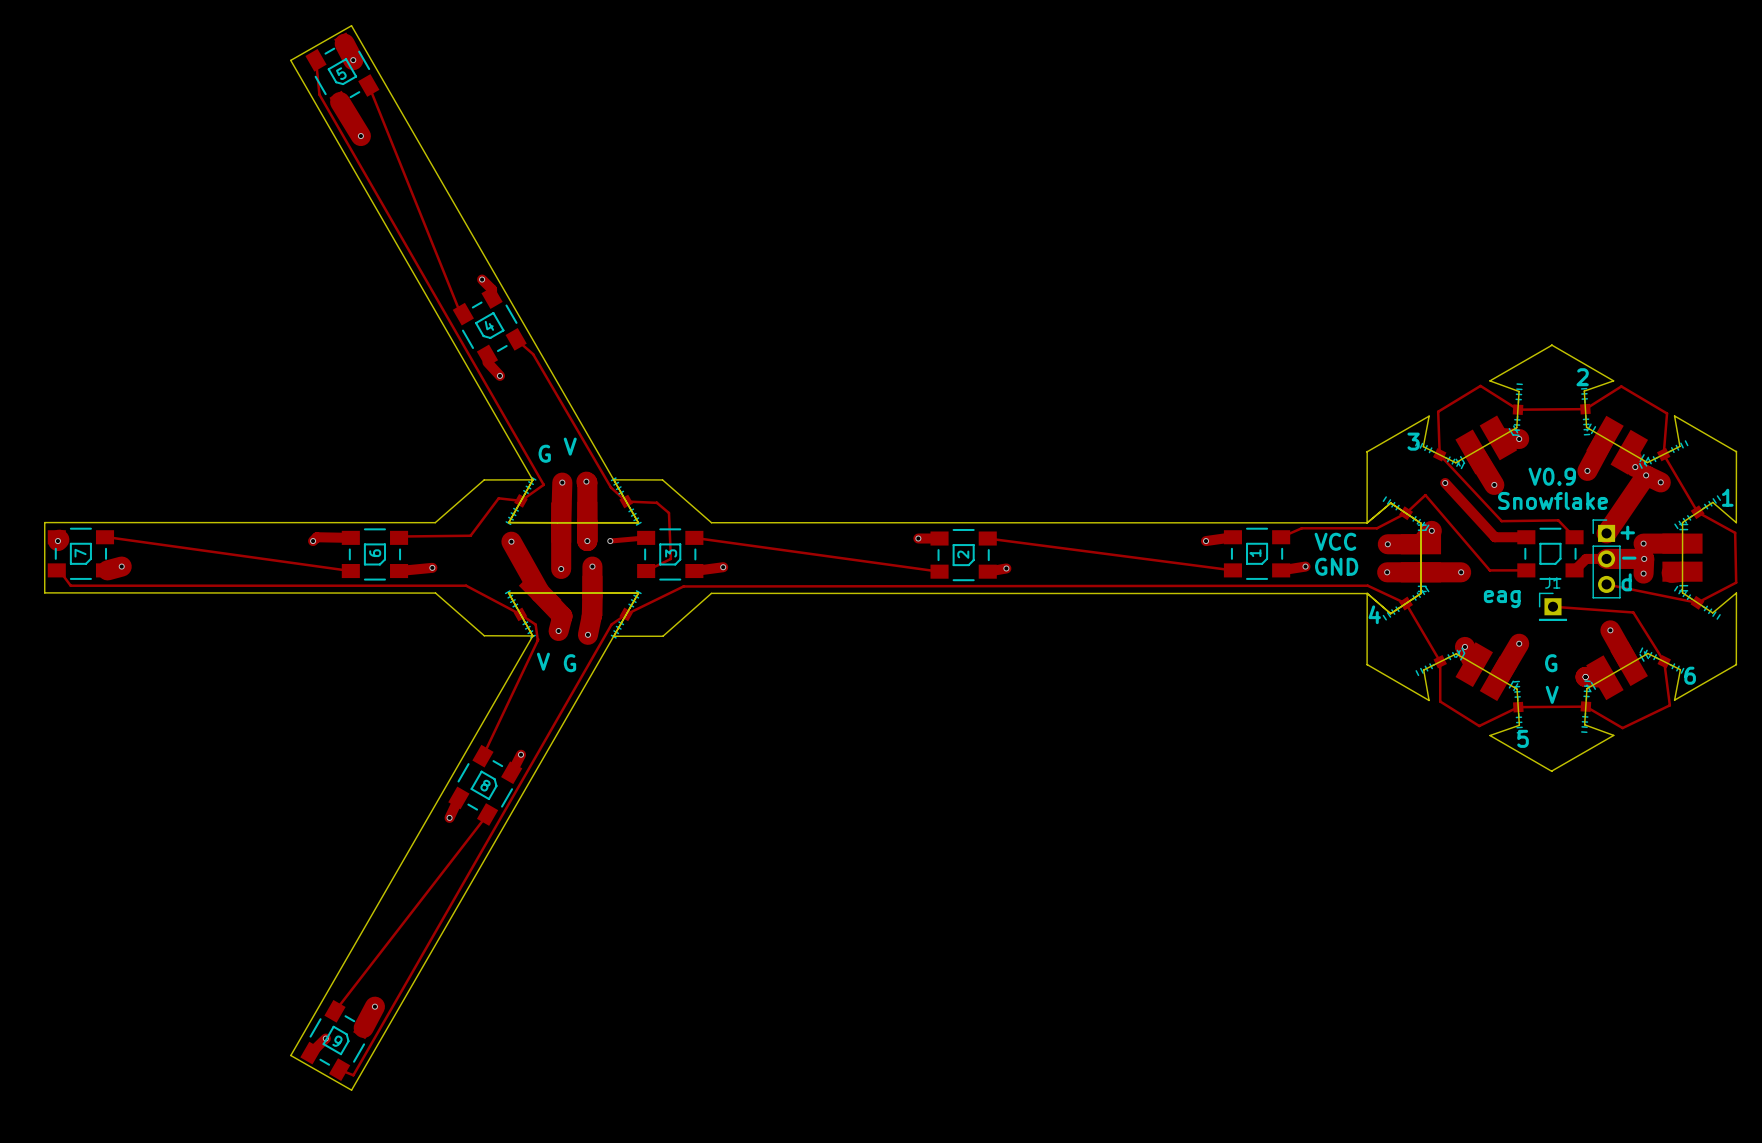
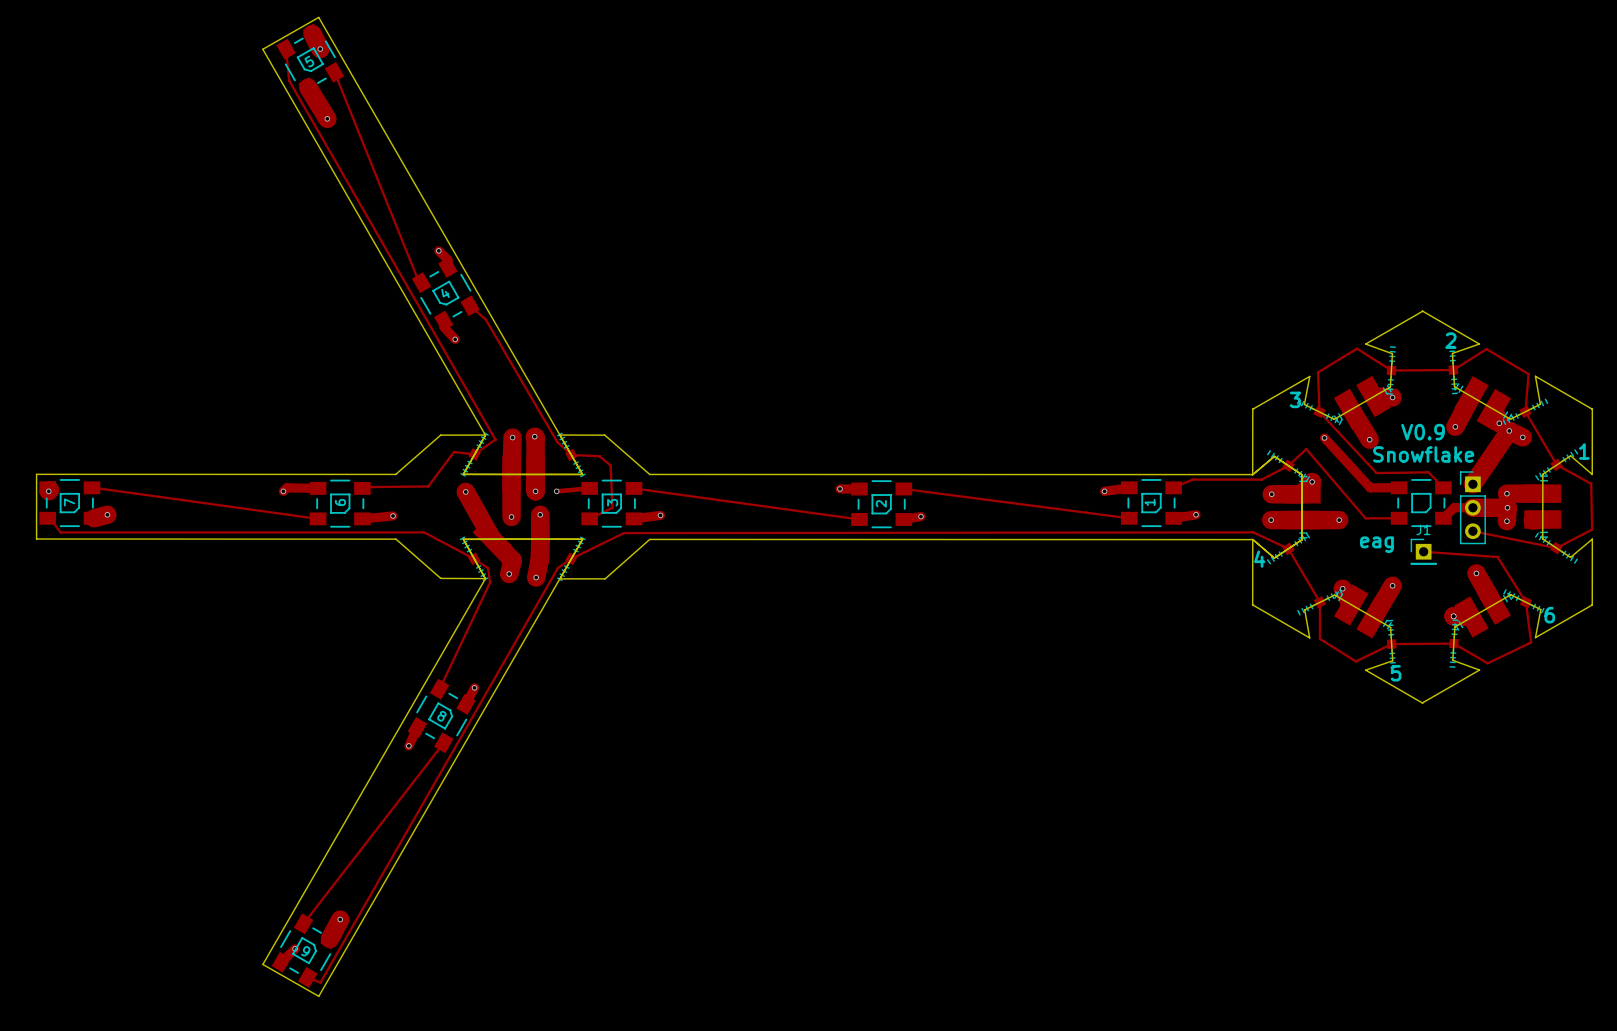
text: V (570, 446) -> none
text: G (544, 453) -> none
text: + (1627, 532) -> none
text: VCC (1335, 541) -> none
text: - (1629, 558) -> none
text: GND (1336, 566) -> none
text: d (1626, 582) -> none
text: V (543, 661) -> none
text: G (569, 663) -> none
text: G (1551, 663) -> none
text: V (1552, 694) -> none

